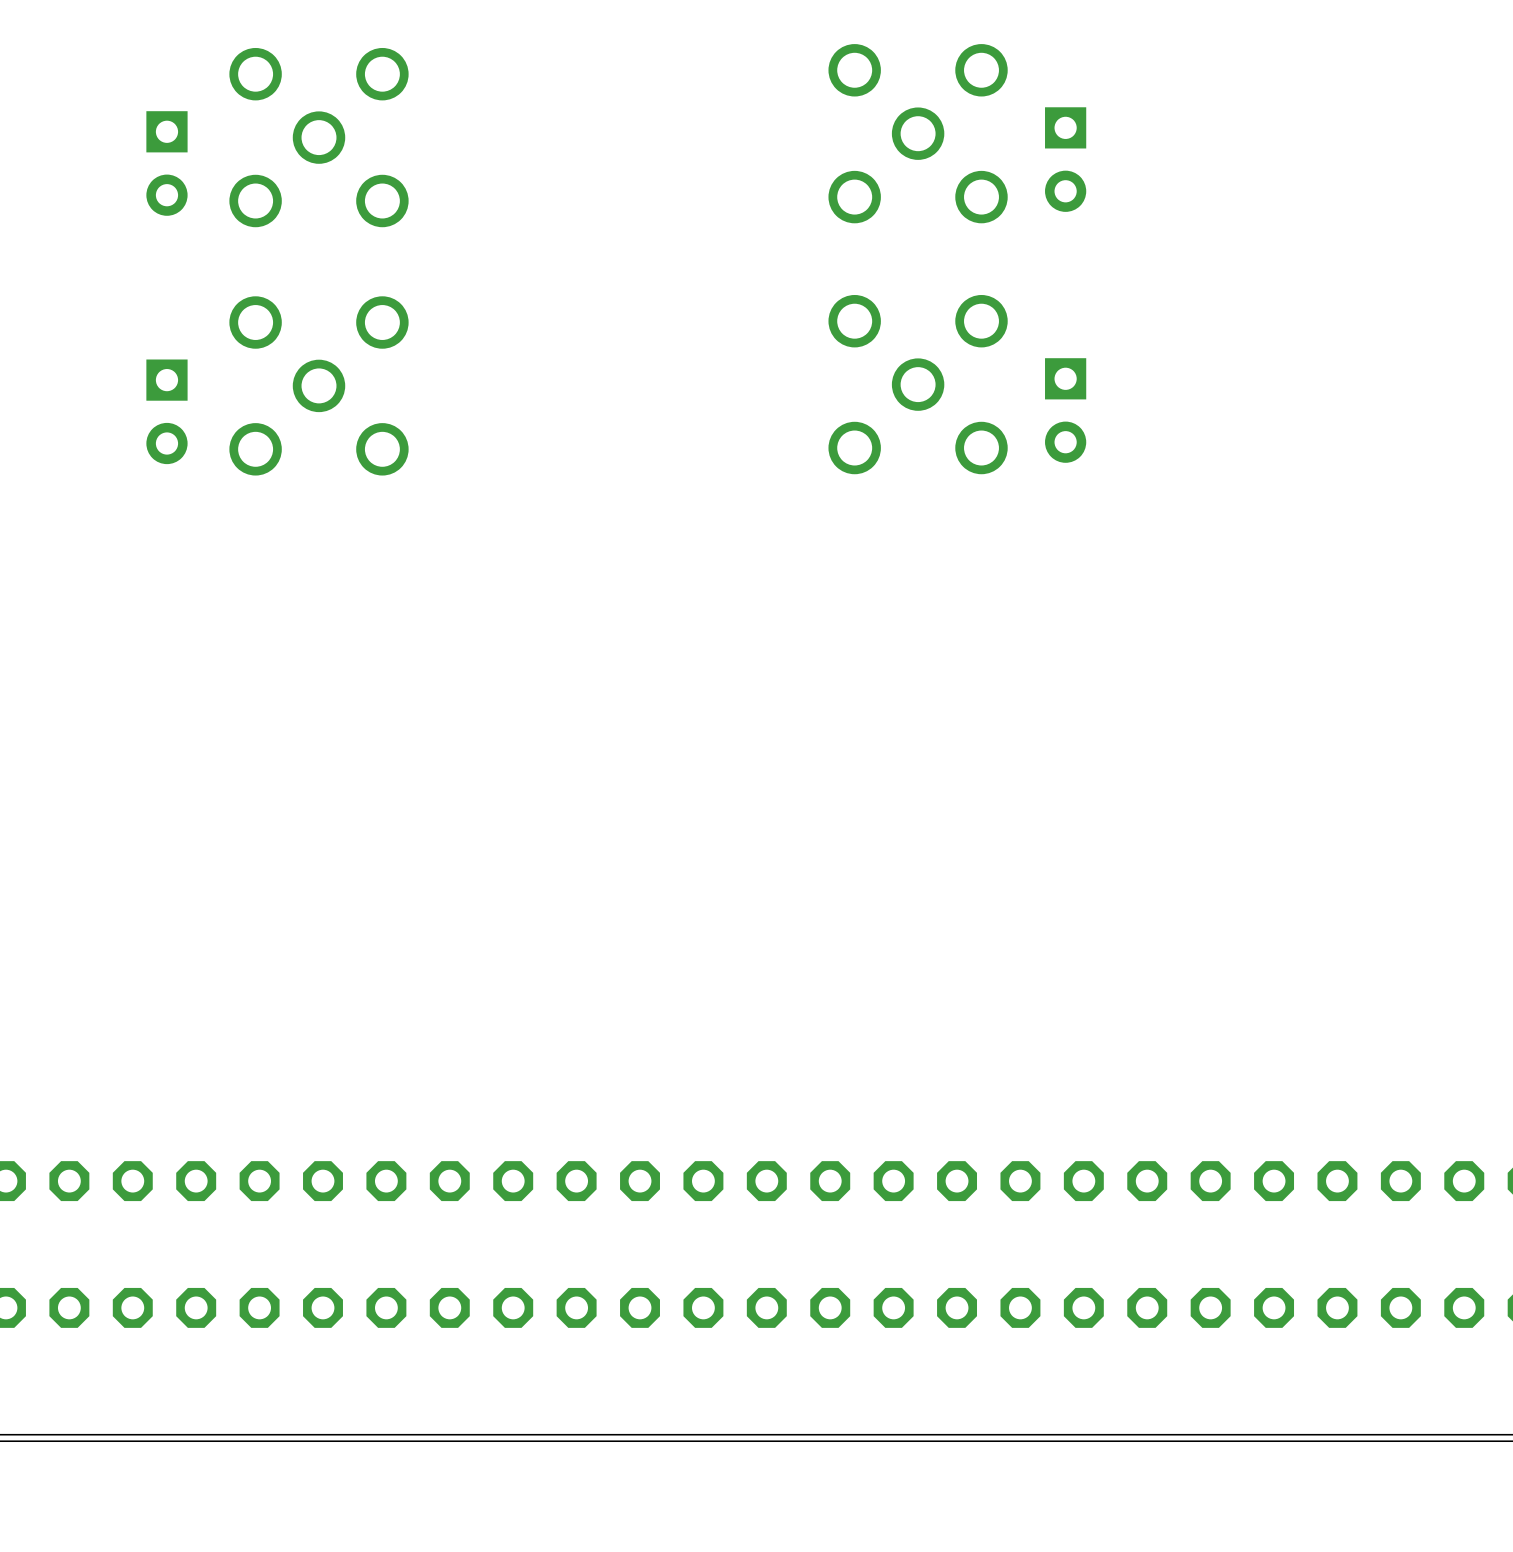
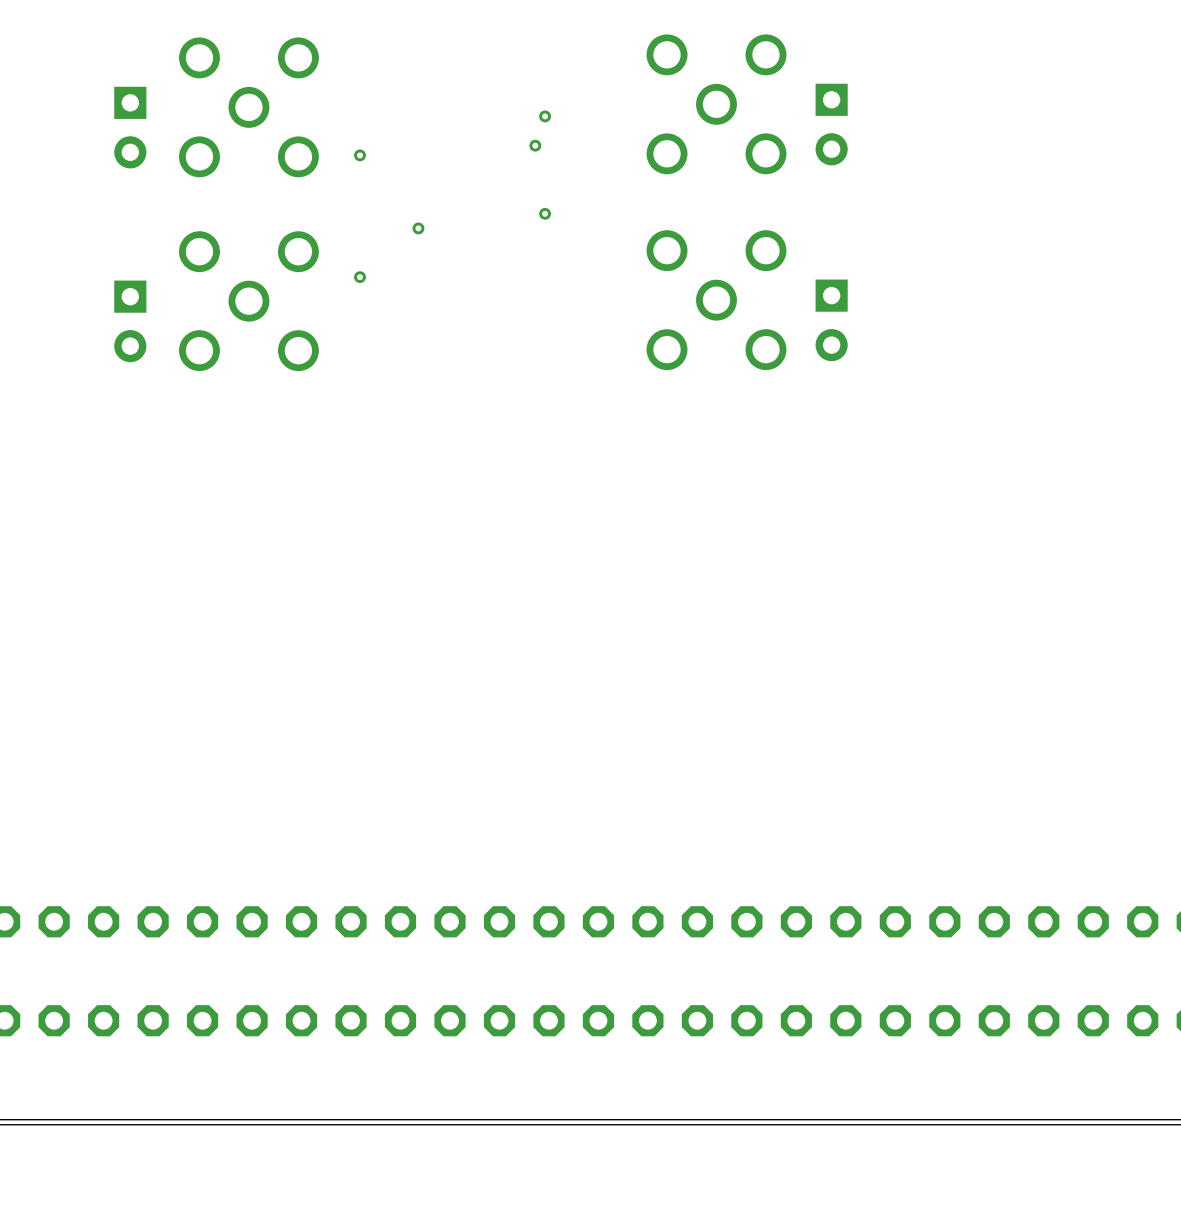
via: none -> (545, 116)
via: none -> (535, 145)
via: none -> (360, 155)
via: none -> (545, 213)
via: none -> (418, 228)
via: none -> (360, 277)

